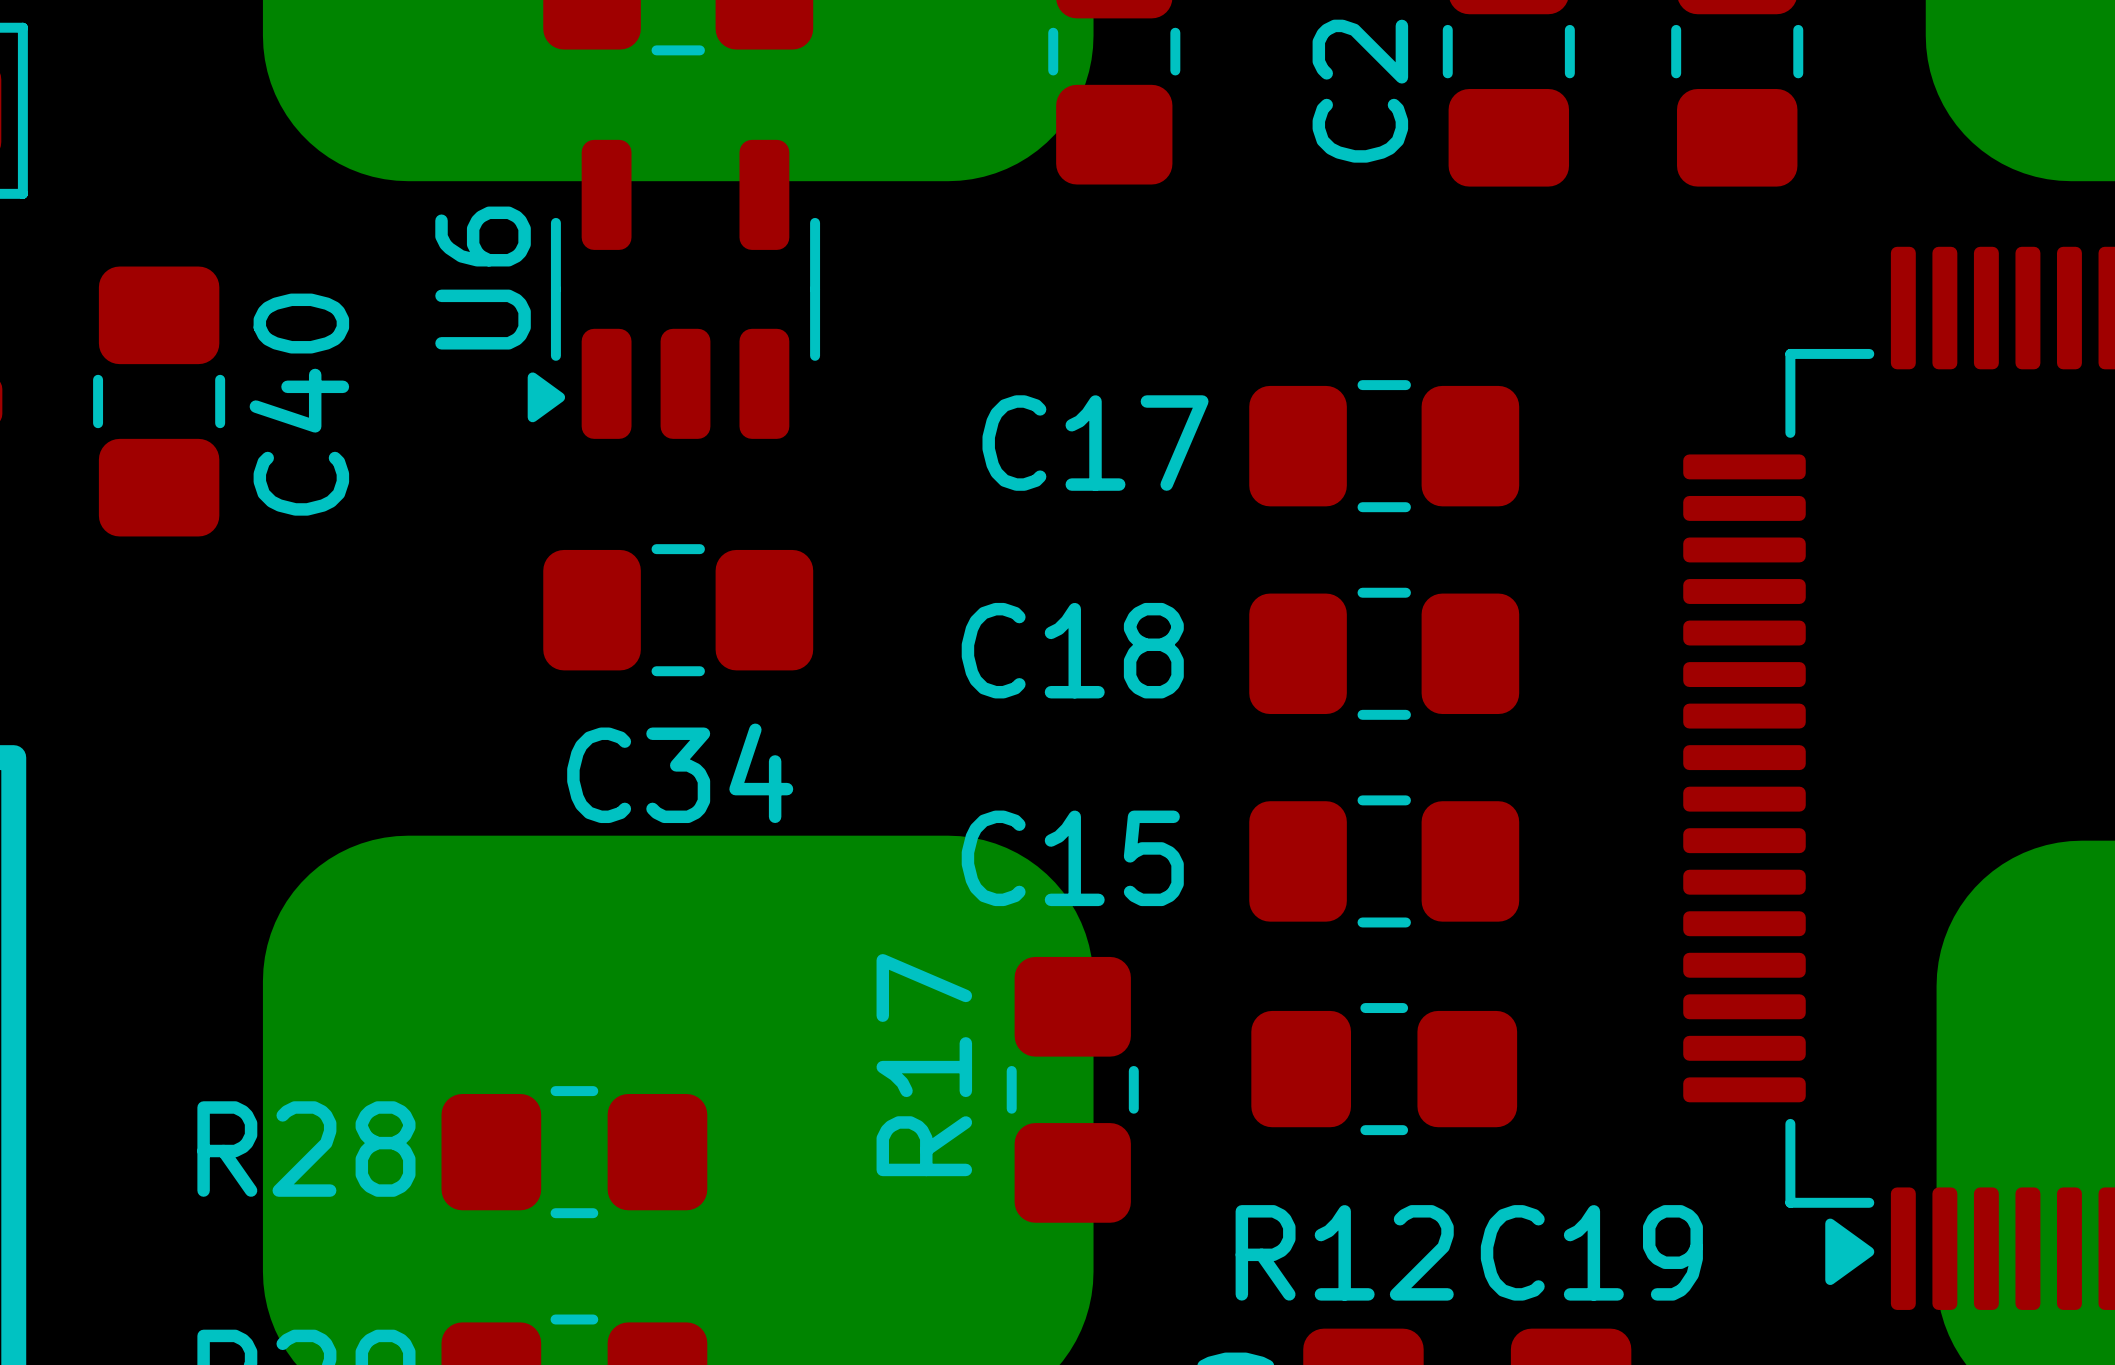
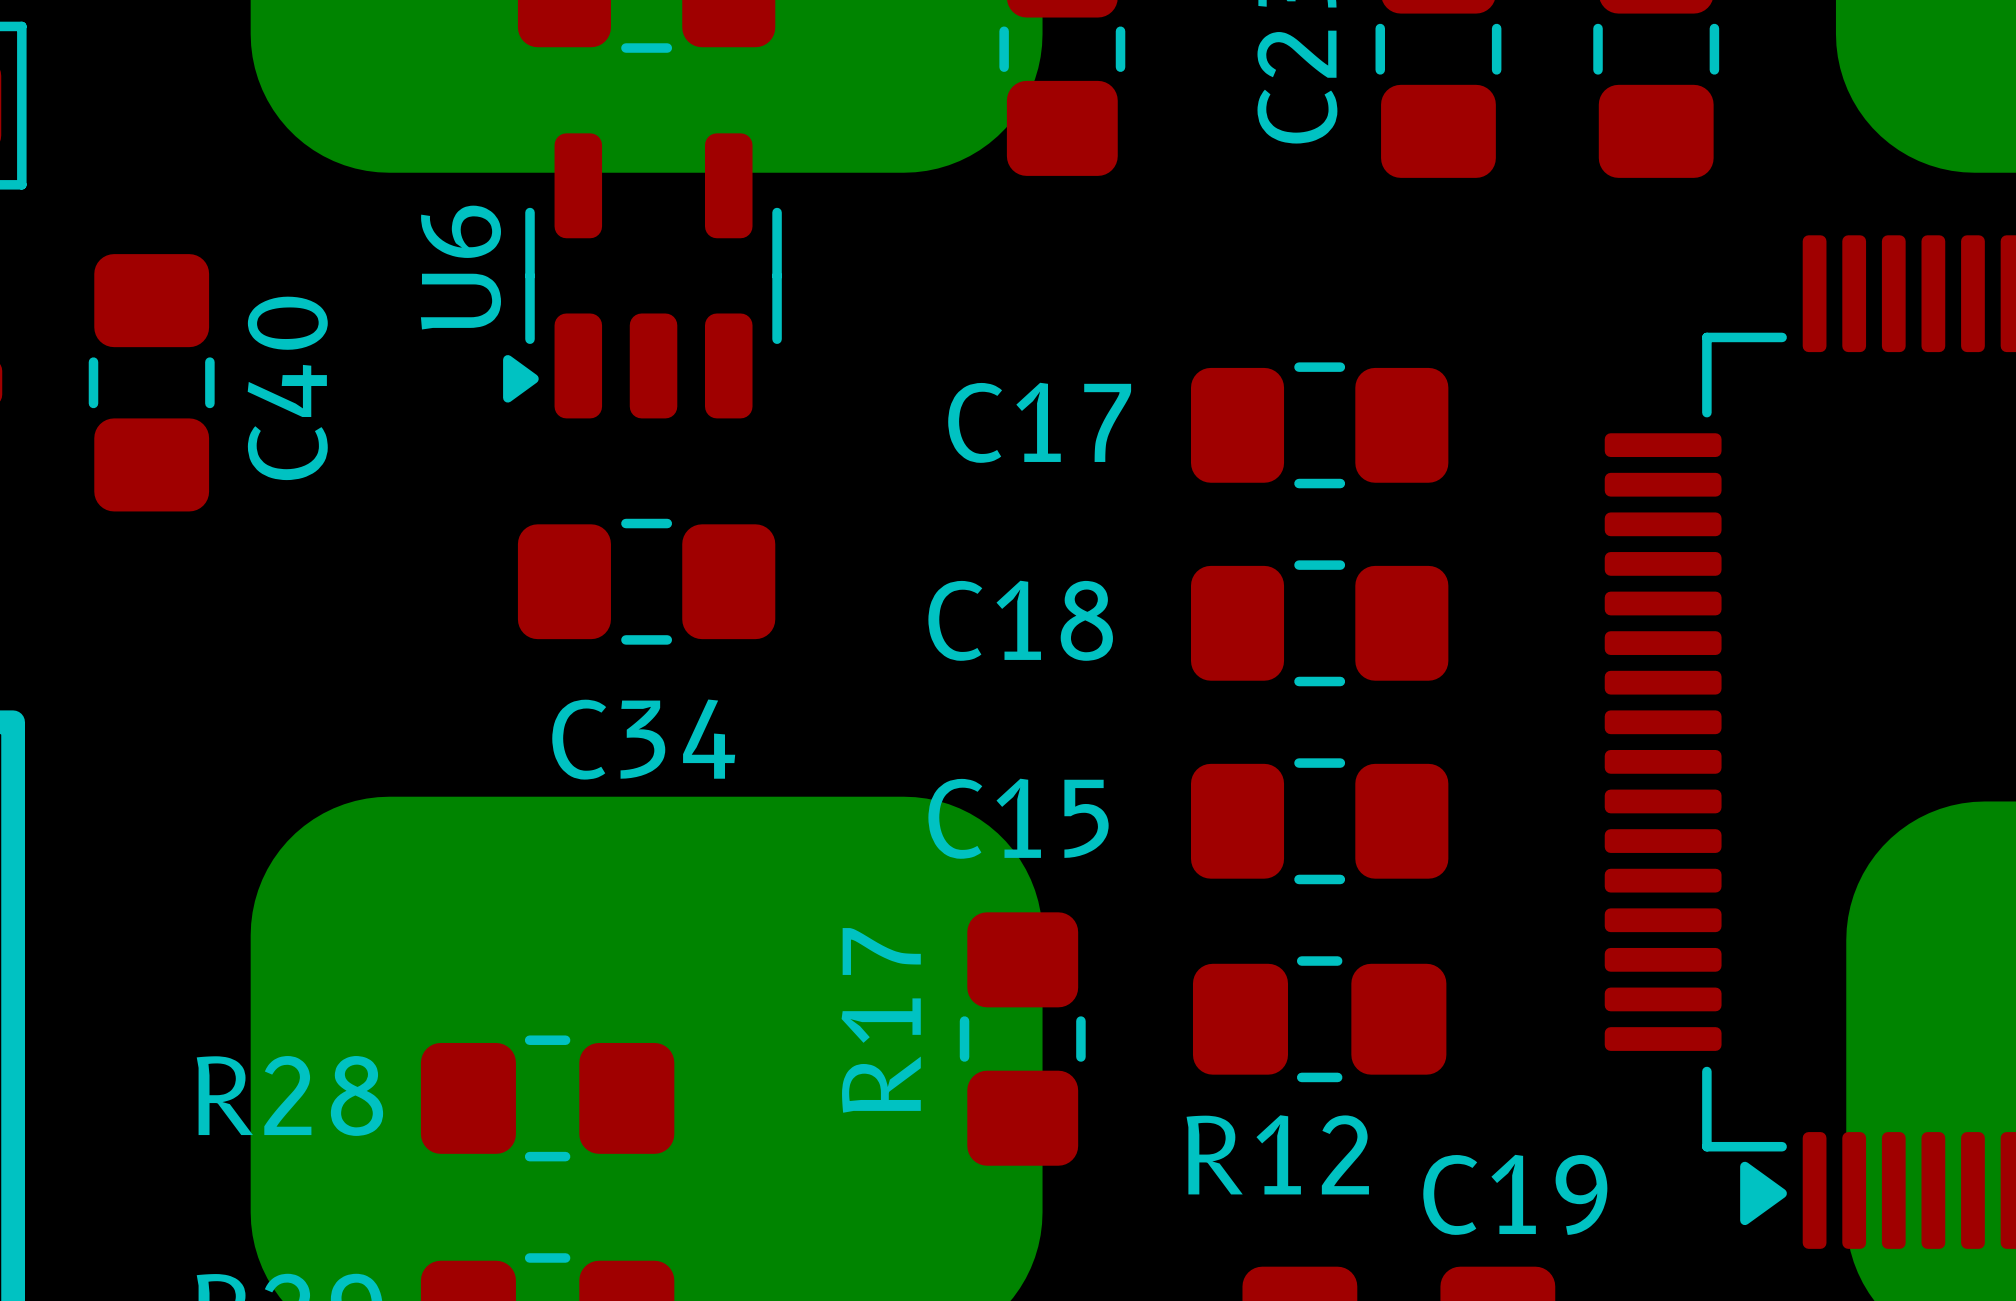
R12 name position: R12 (1344, 1252) -> R12 (1277, 1154)

